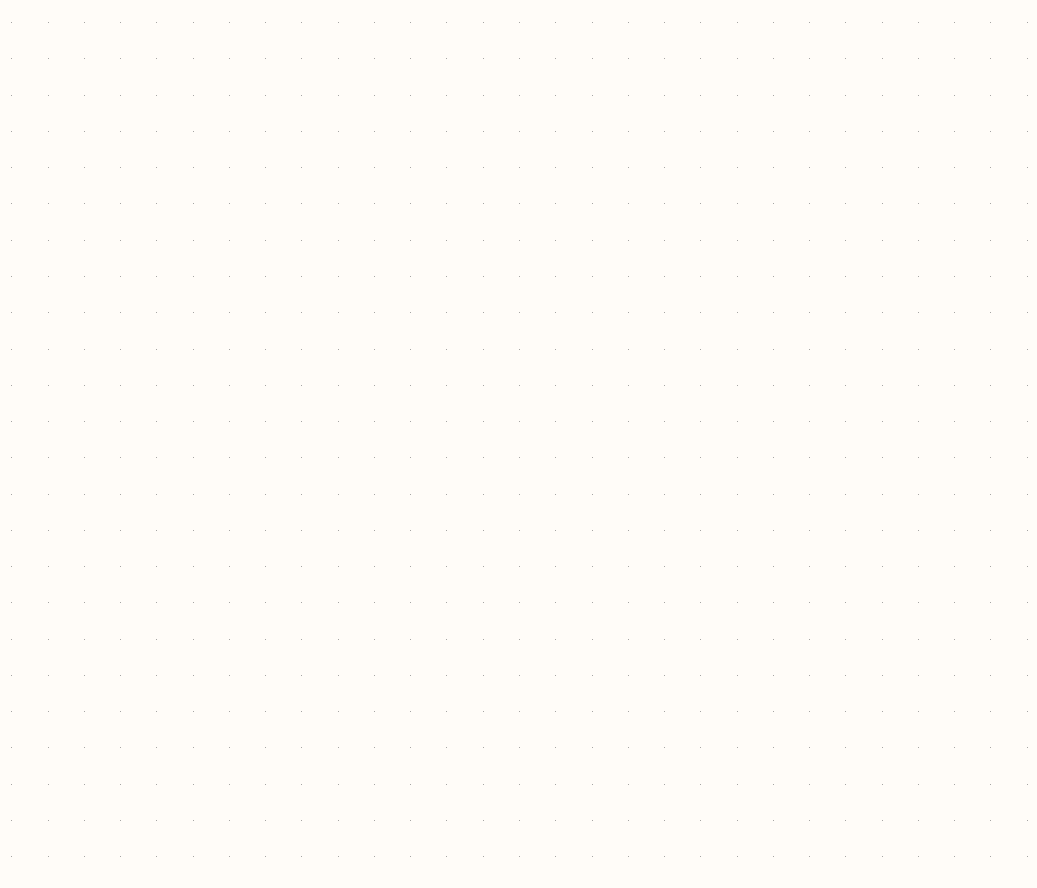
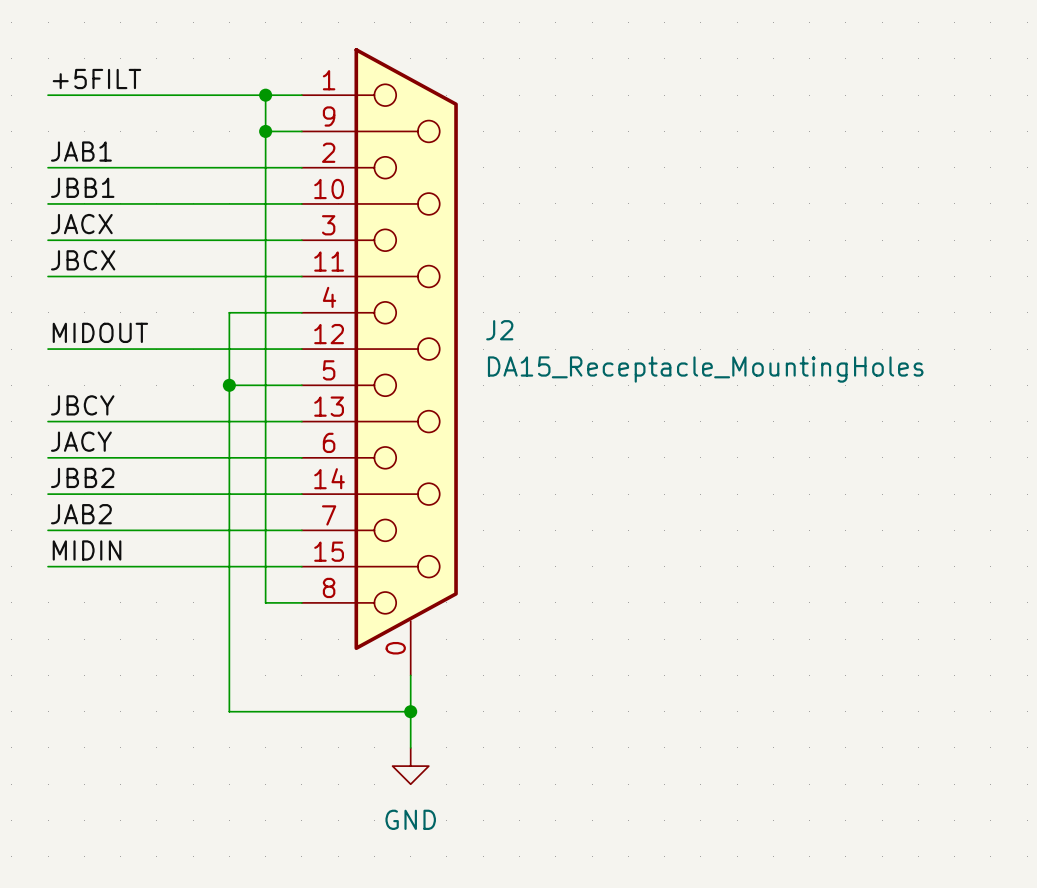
label: none -> +5FILT (96, 79)
wire: none -> (48, 95) (301, 95)
wire: none -> (265, 95) (265, 602) (301, 602)
junction: none -> (265, 95)
wire: none -> (265, 131) (301, 131)
junction: none -> (265, 131)
label: none -> JAB1 (81, 151)
wire: none -> (48, 167) (301, 167)
label: none -> JBB1 (82, 187)
wire: none -> (48, 203) (301, 203)
label: none -> JACX (81, 224)
wire: none -> (48, 240) (301, 240)
label: none -> JBCX (83, 260)
wire: none -> (48, 276) (301, 276)
wire: none -> (301, 312) (229, 312) (229, 711) (410, 711)
label: none -> MIDOUT (100, 332)
wire: none -> (48, 349) (301, 349)
J2: none -> DA15_Receptacle_MountingHoles (379, 361)
wire: none -> (229, 385) (301, 385)
junction: none -> (229, 385)
label: none -> JBCY (82, 405)
wire: none -> (48, 421) (301, 421)
label: none -> JACY (81, 441)
wire: none -> (48, 457) (301, 457)
label: none -> JBB2 (82, 477)
wire: none -> (48, 494) (301, 494)
label: none -> JAB2 (81, 514)
wire: none -> (48, 530) (301, 530)
label: none -> MIDIN (87, 550)
wire: none -> (48, 566) (301, 566)
wire: none -> (410, 675) (410, 747)
junction: none -> (410, 711)
power symbol: none -> GND (410, 766)

